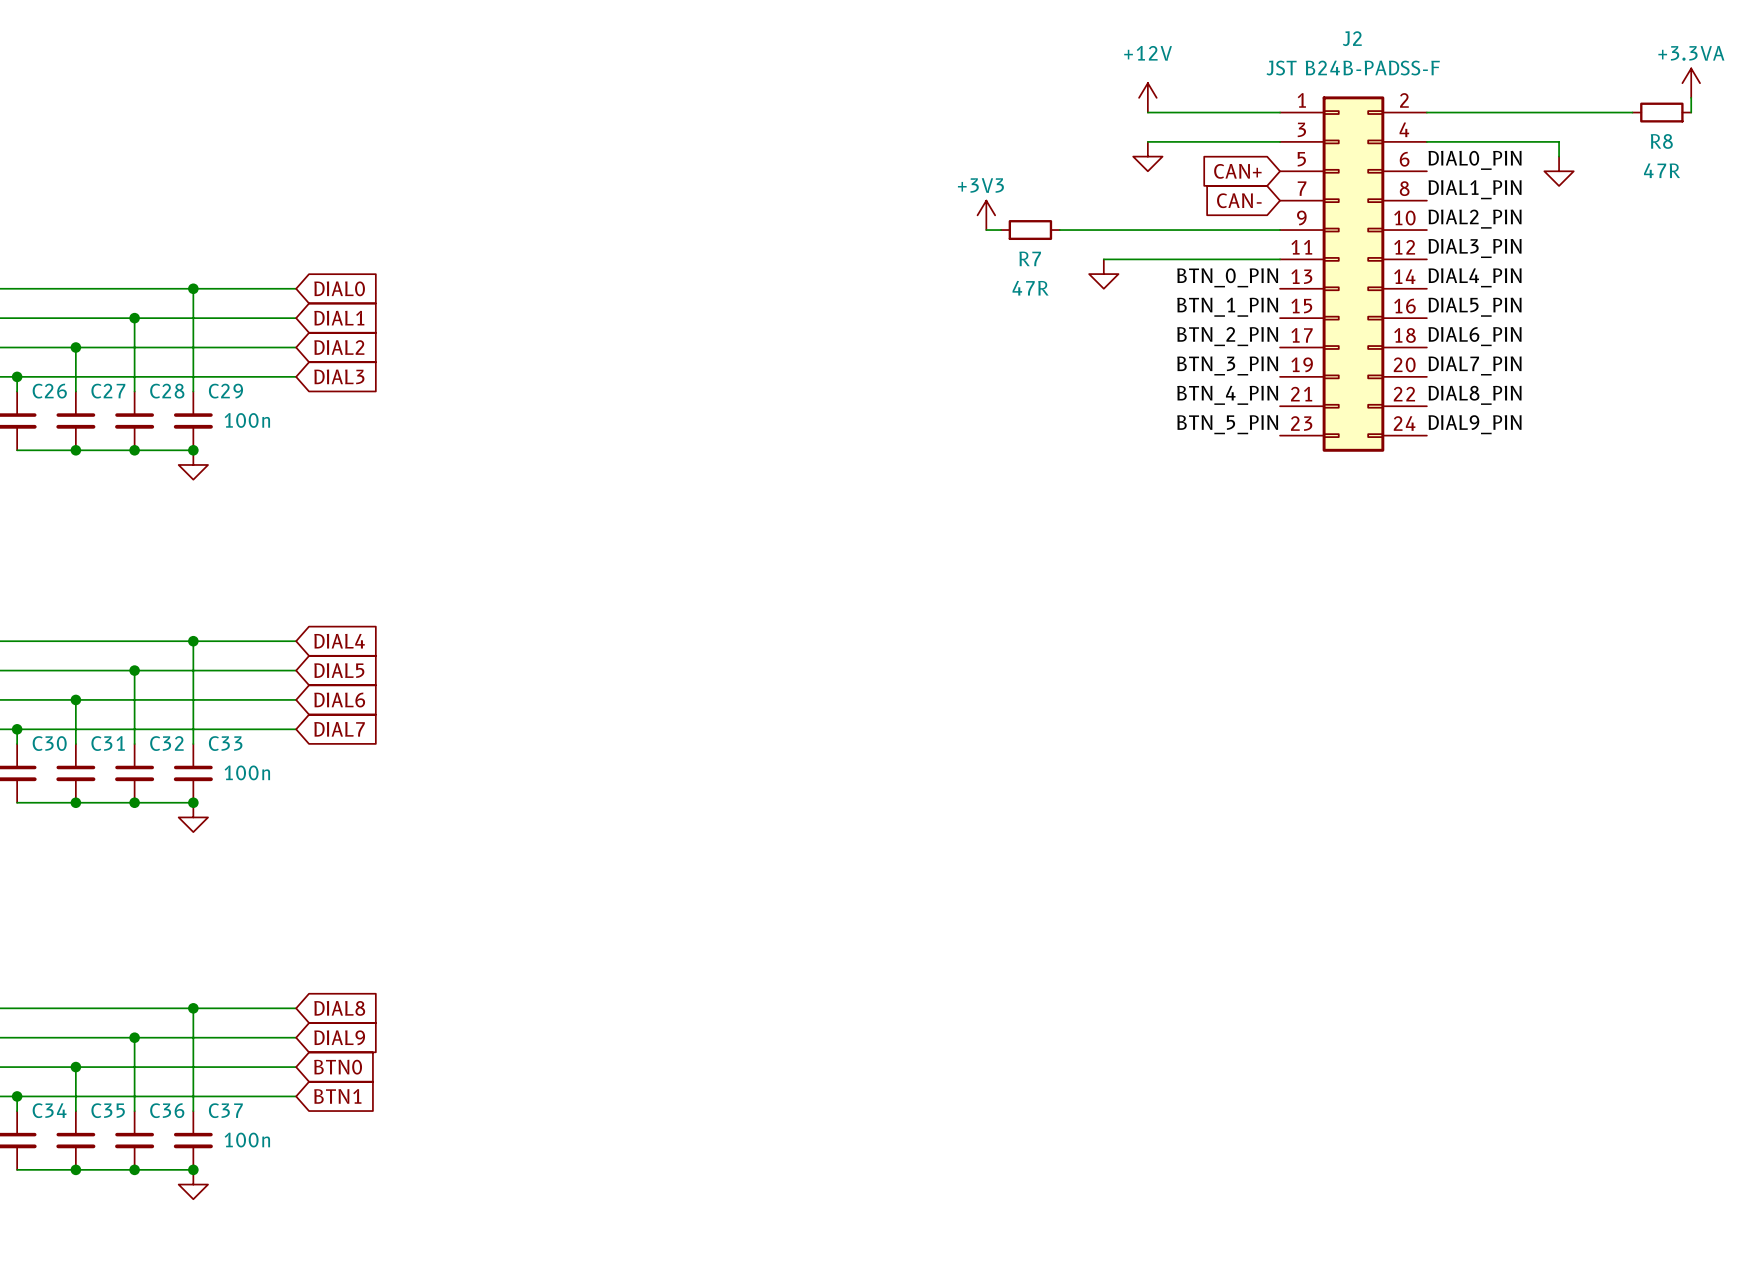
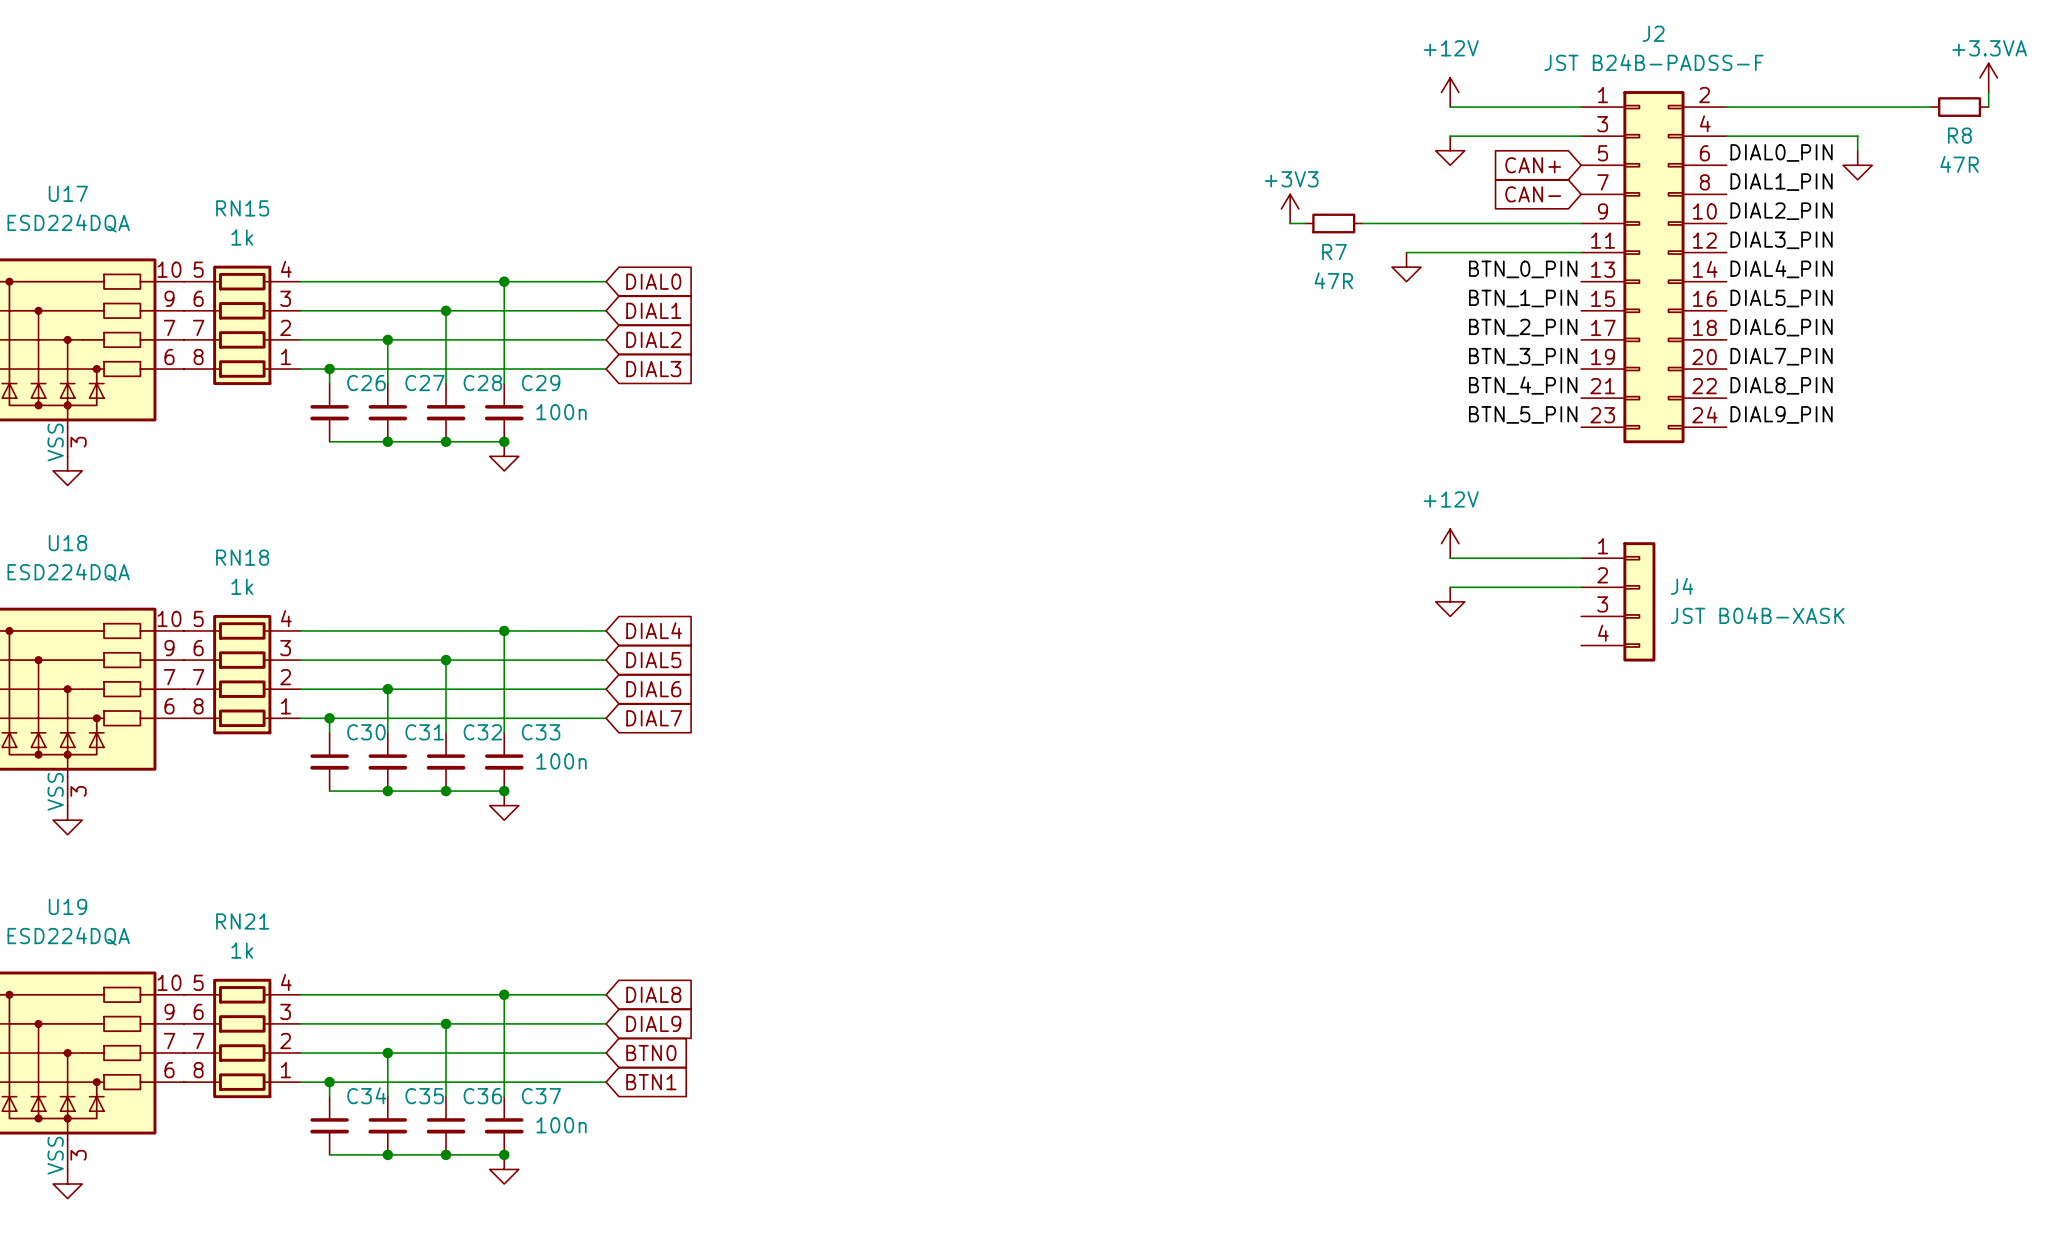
power symbol: none -> +12V (1450, 543)
wire: none -> (1450, 558) (1581, 558)
wire: none -> (1450, 587) (1581, 587)
power symbol: none -> (1450, 601)
J4: none -> JST B04B-XASK (1618, 601)

